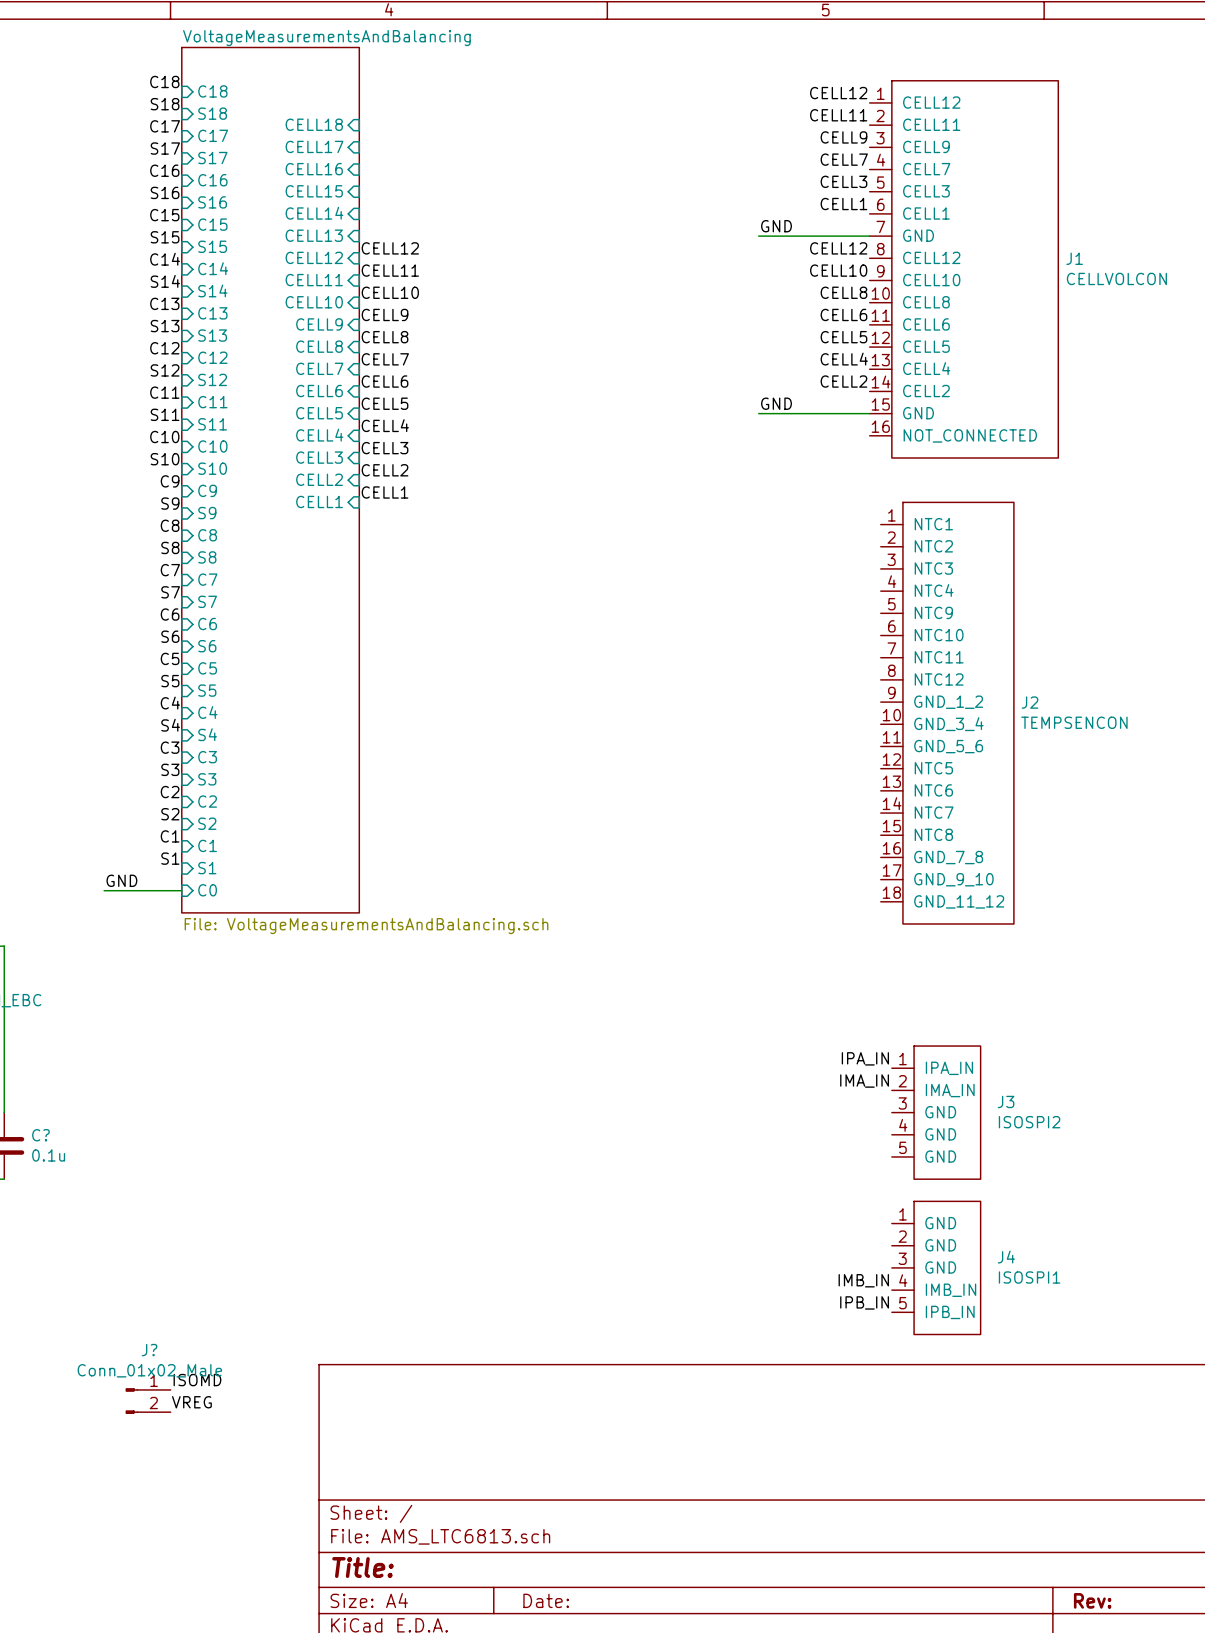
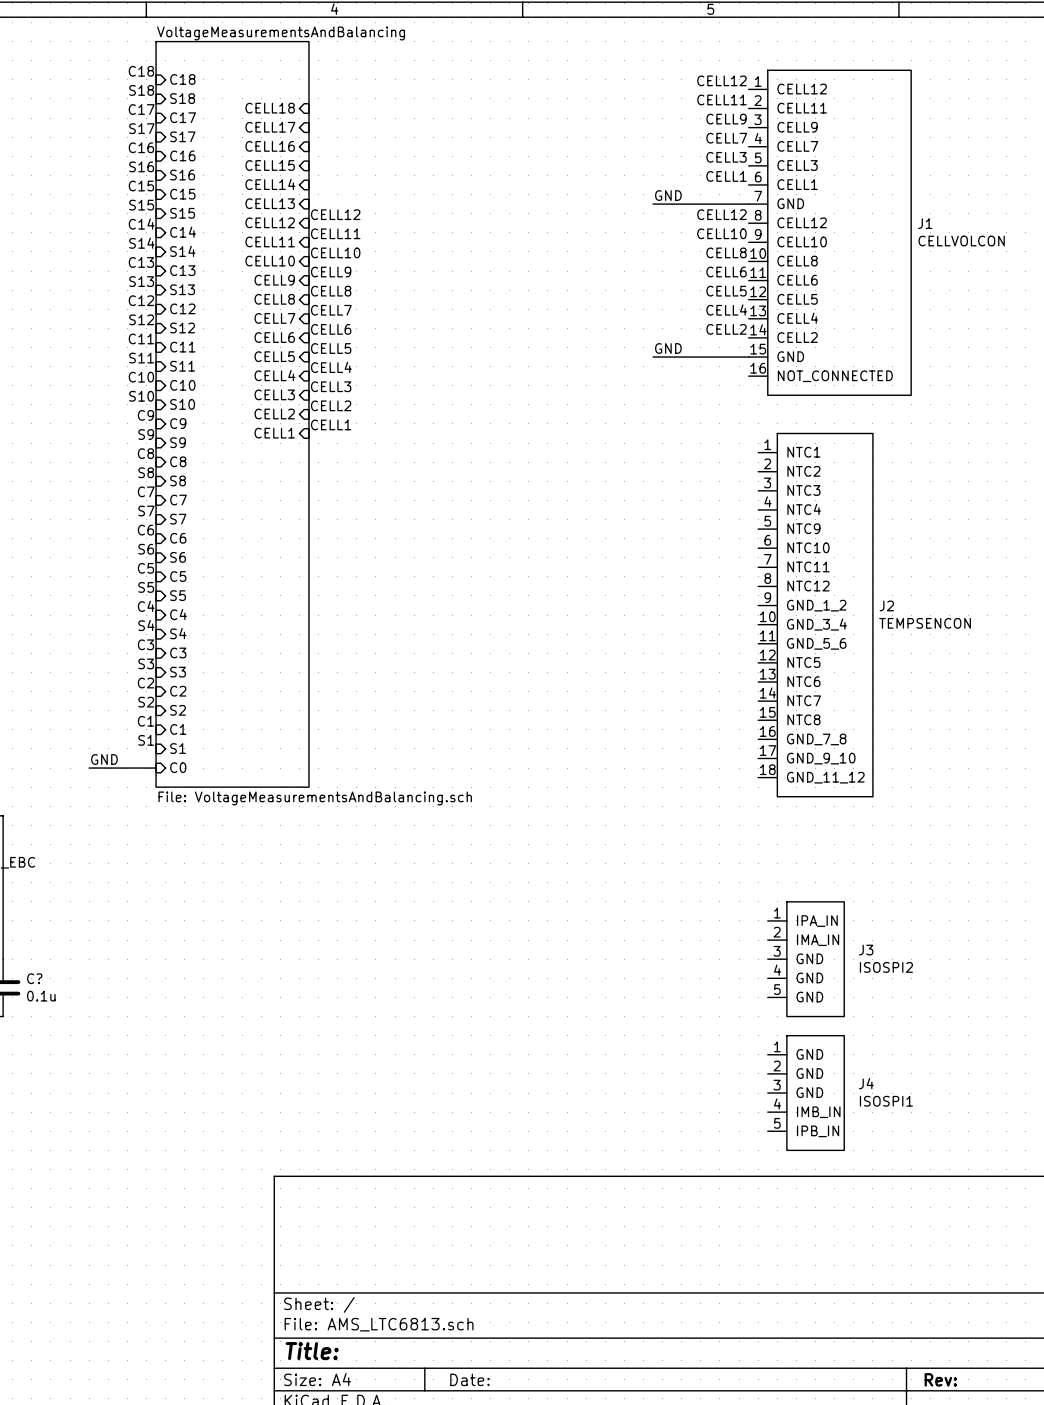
label: IPA_IN (865, 1058) -> none
label: IMA_IN (864, 1081) -> none
label: IMB_IN (863, 1280) -> none
label: IPB_IN (864, 1302) -> none
label: ISOMD (197, 1380) -> none
J?: Conn_01x02_Male (148, 1401) -> none
label: VREG (191, 1402) -> none

